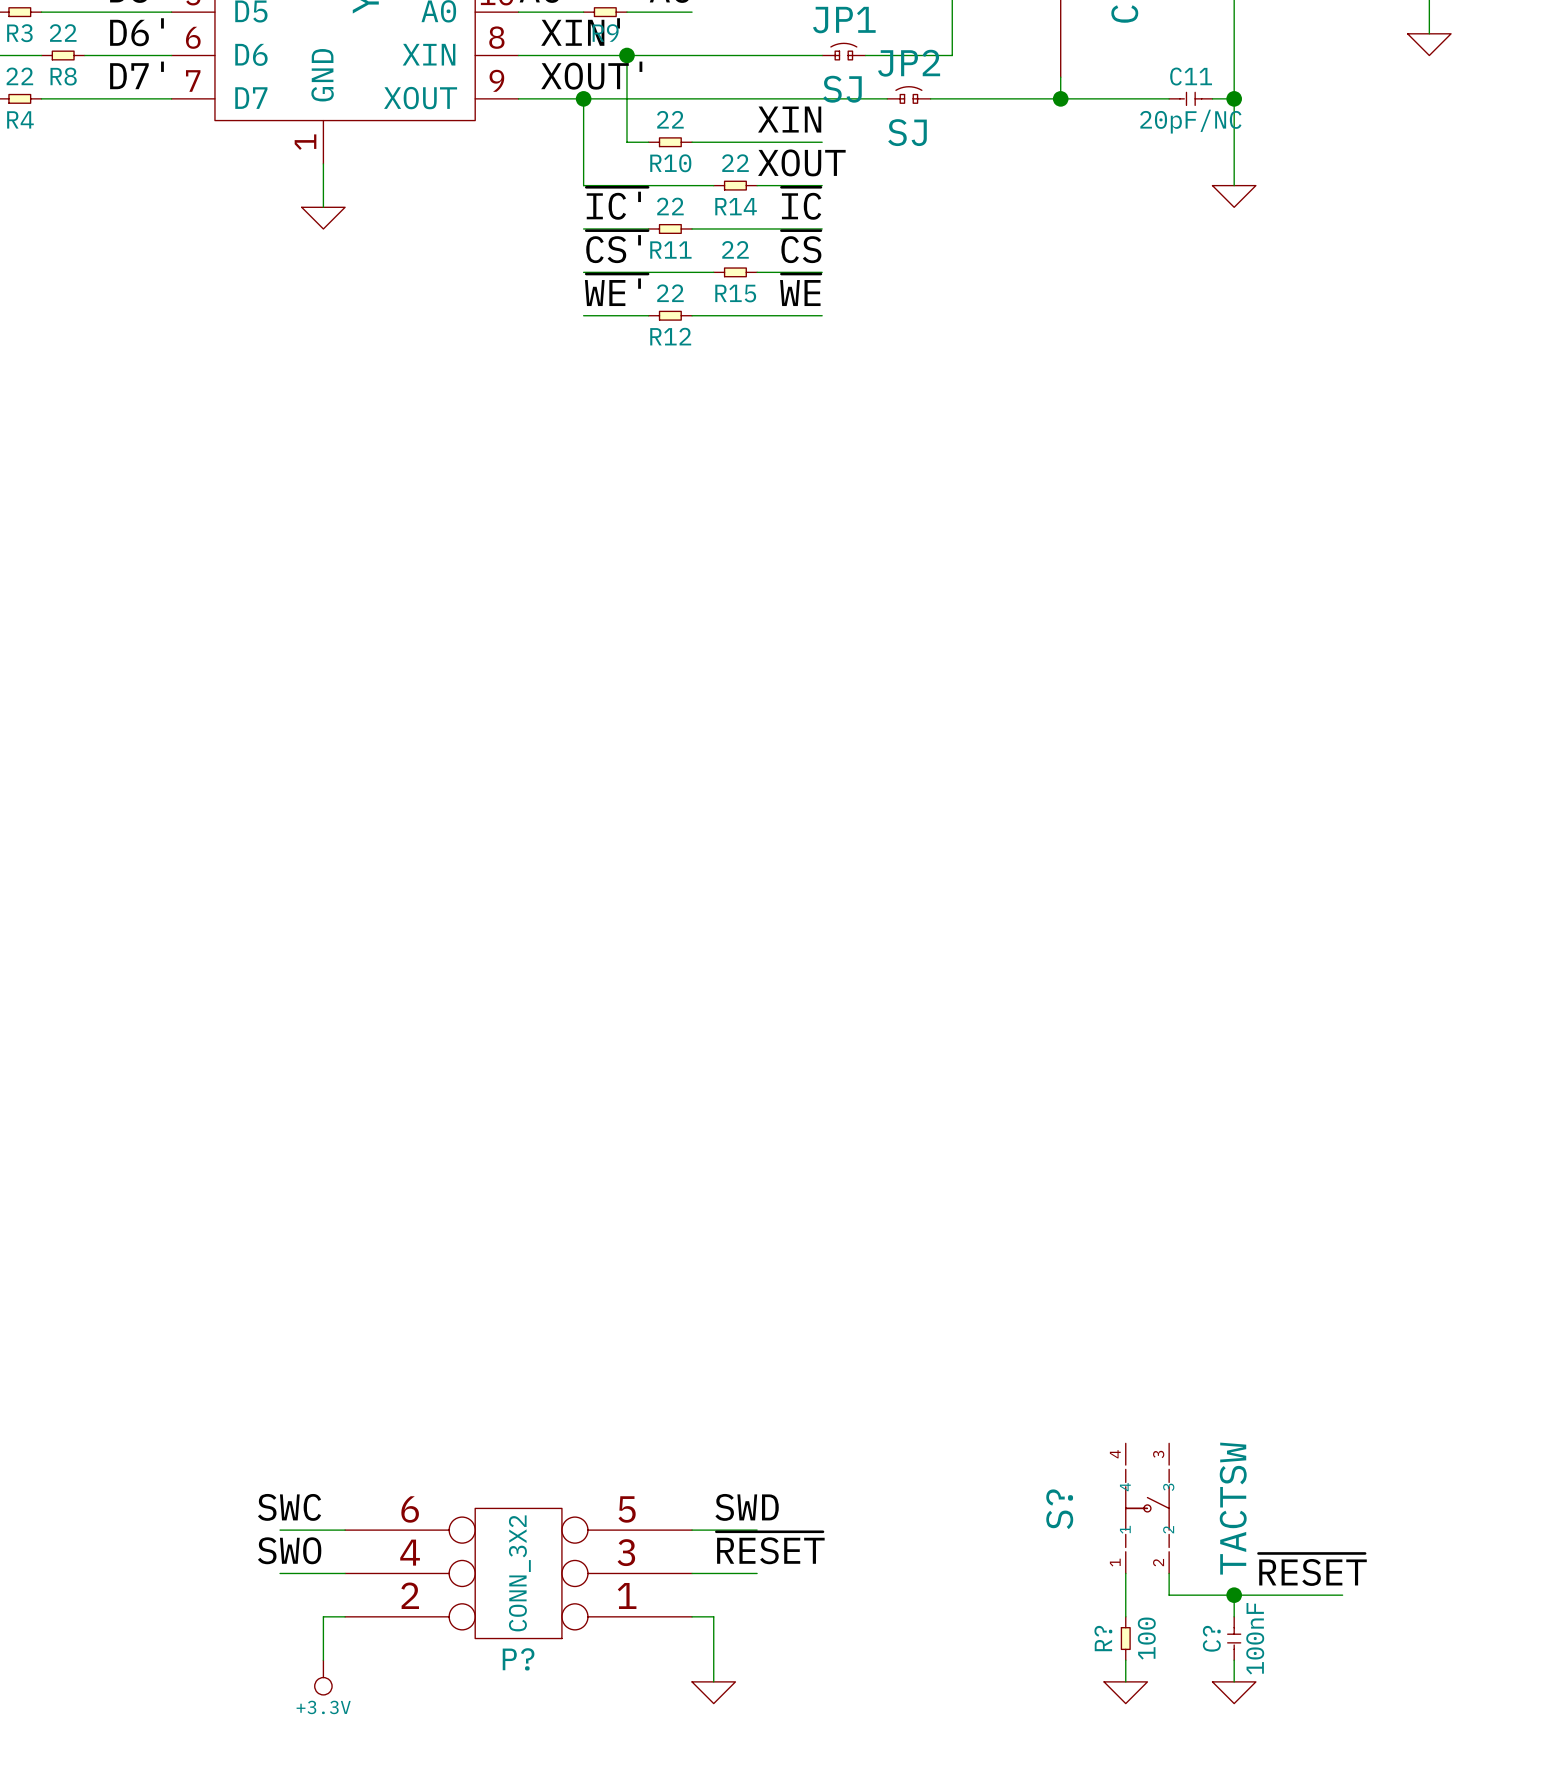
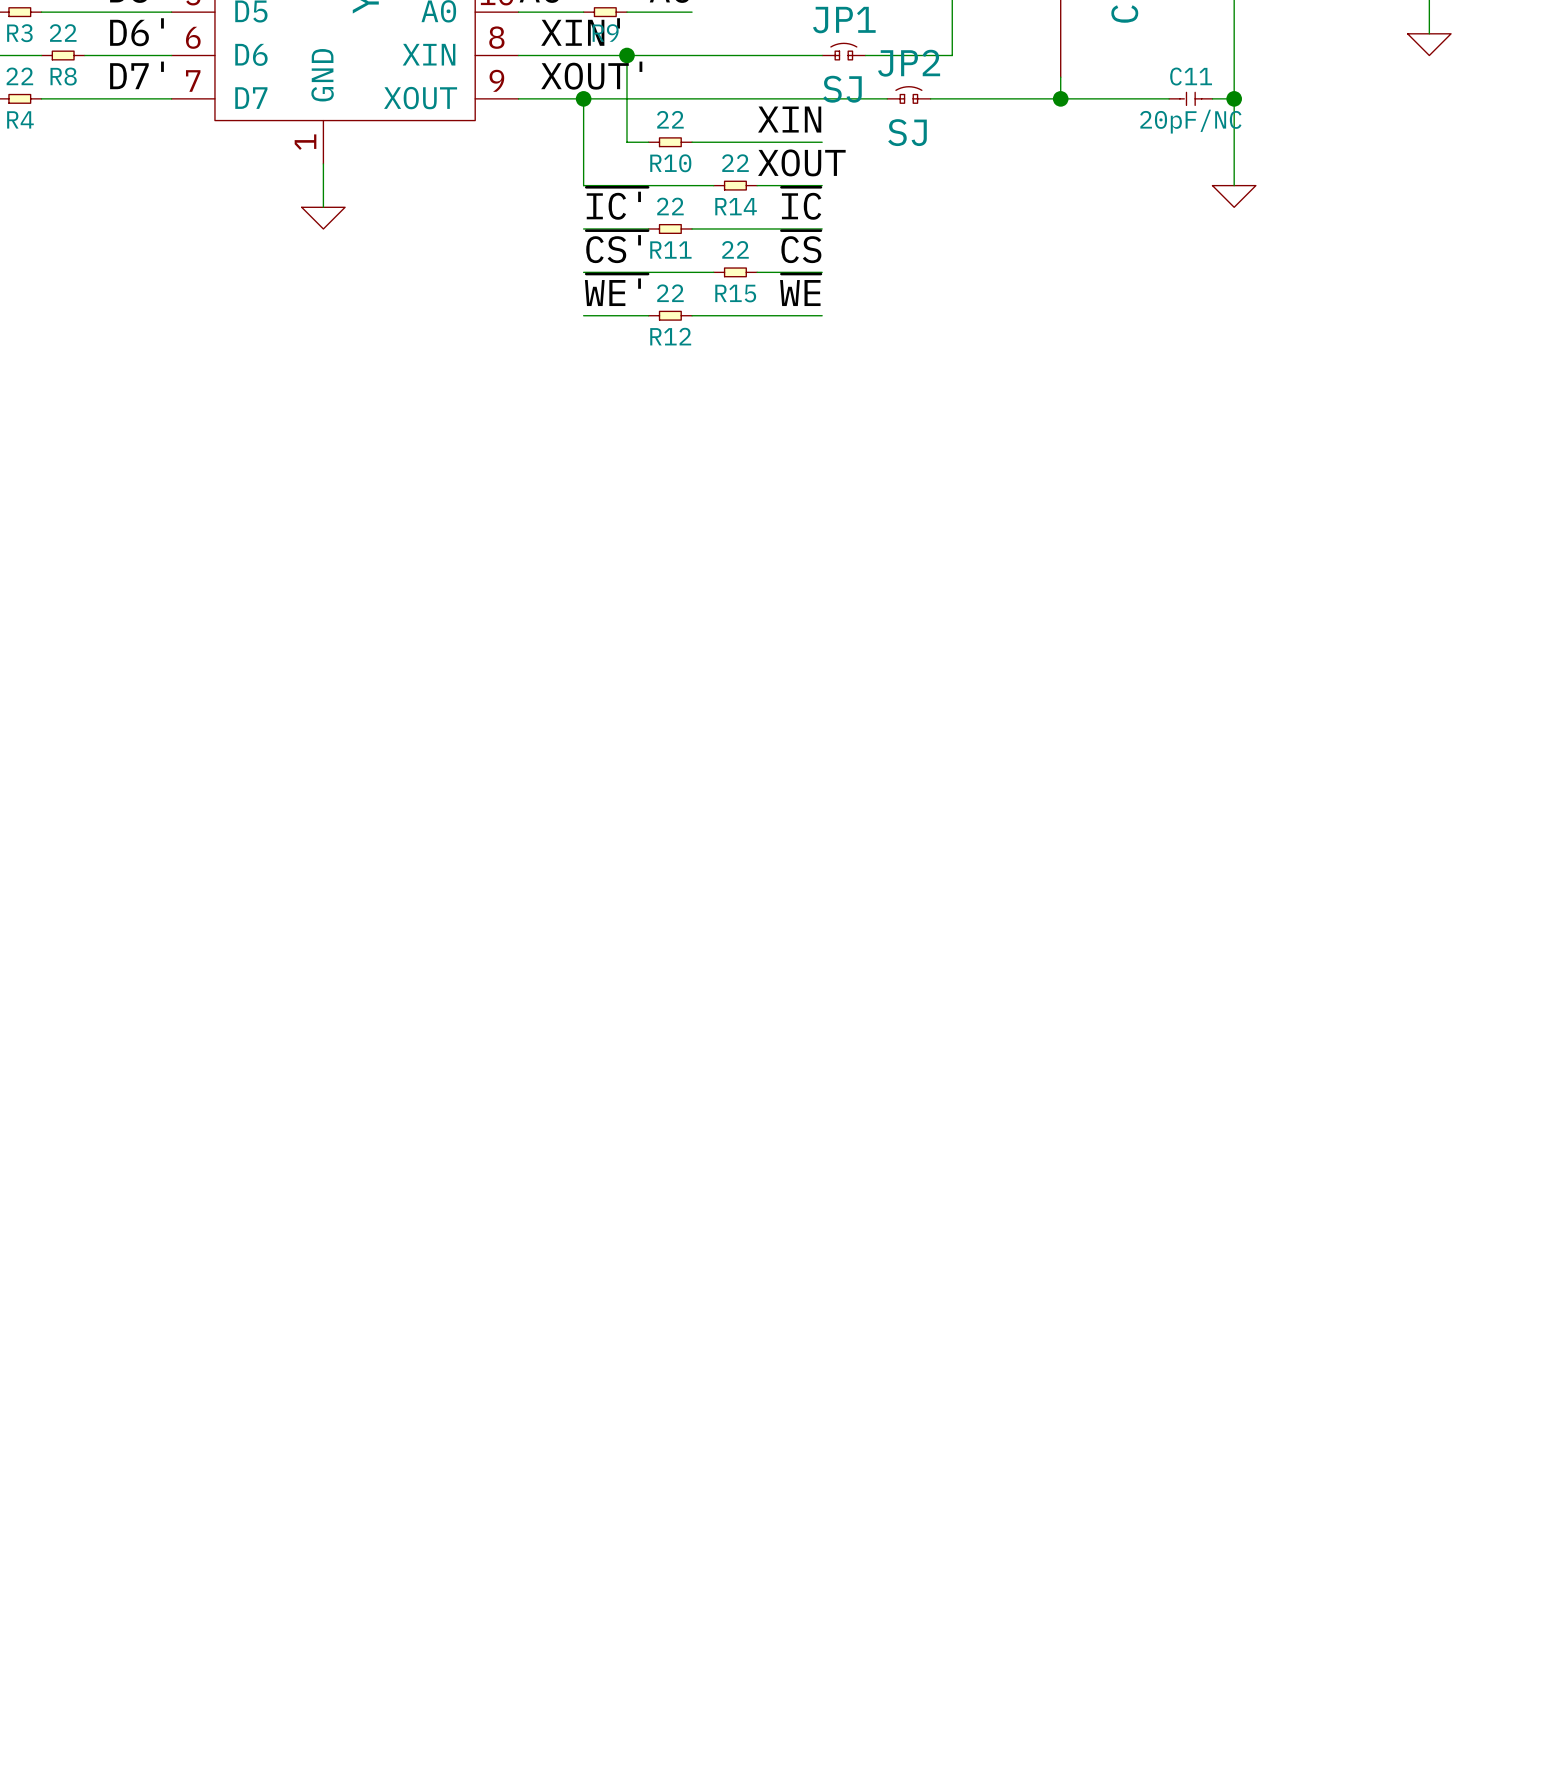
label: SWC (289, 1507) -> none
label: SWD (747, 1507) -> none
S?: TACTSW (1147, 1508) -> none
wire: (280, 1530) (345, 1530) -> none
wire: (692, 1530) (757, 1530) -> none
label: ~{RESET} (770, 1548) -> none
label: SWO (289, 1550) -> none
label: ~{RESET} (1312, 1569) -> none
wire: (280, 1573) (345, 1573) -> none
P?: CONN_3X2 (518, 1573) -> none
wire: (692, 1573) (757, 1573) -> none
wire: (1125, 1573) (1125, 1616) -> none
wire: (1169, 1573) (1169, 1595) (1342, 1595) -> none
wire: (1234, 1595) (1234, 1616) -> none
junction: (1234, 1595) -> none
wire: (345, 1616) (323, 1616) (323, 1660) -> none
wire: (692, 1616) (713, 1616) (713, 1681) -> none
R?: 100 (1125, 1638) -> none
C?: 100nF (1234, 1638) -> none
wire: (1125, 1660) (1125, 1681) -> none
wire: (1234, 1660) (1234, 1681) -> none
power symbol: +3.3V (323, 1677) -> none
power symbol: (713, 1692) -> none
power symbol: (1125, 1692) -> none
power symbol: (1234, 1692) -> none

